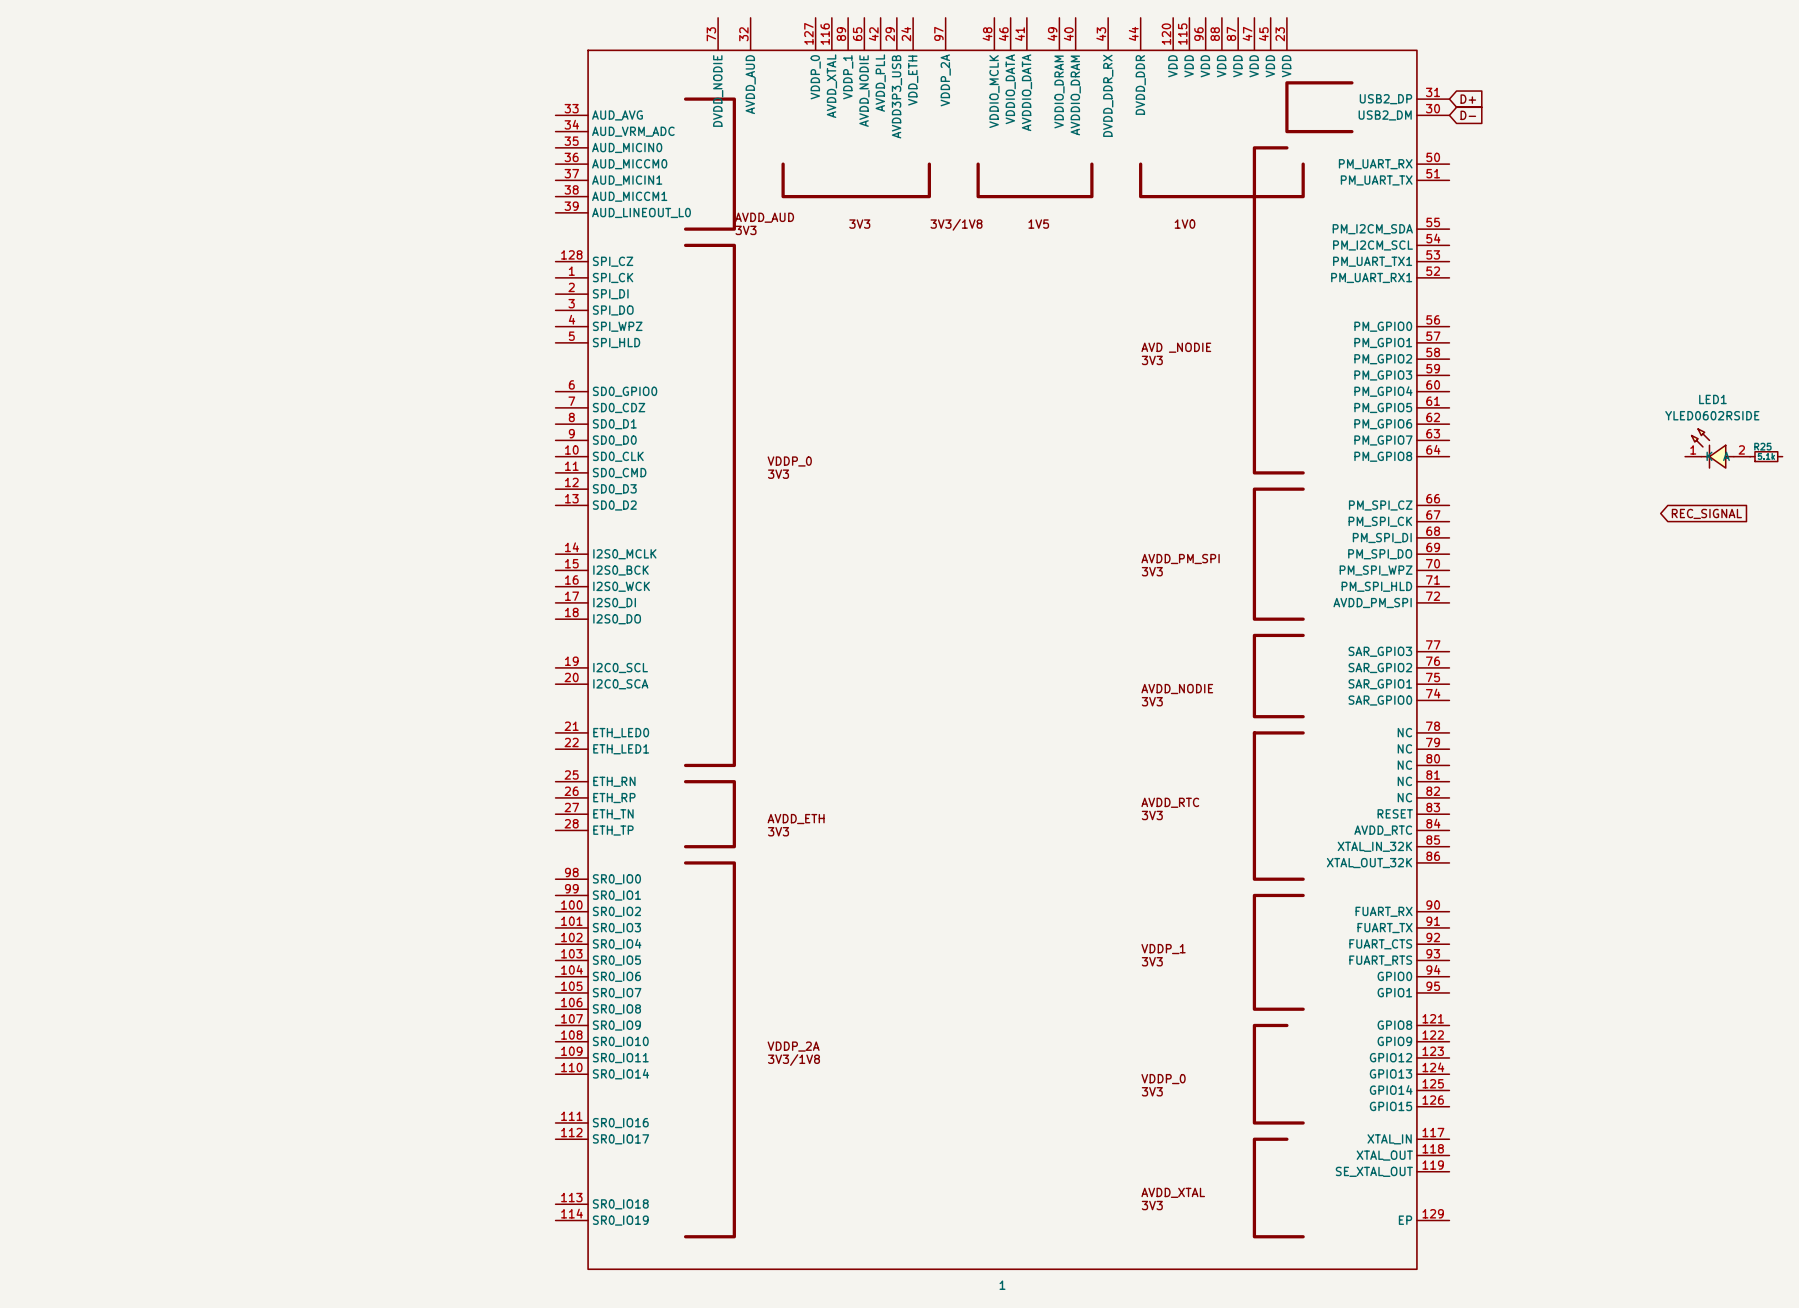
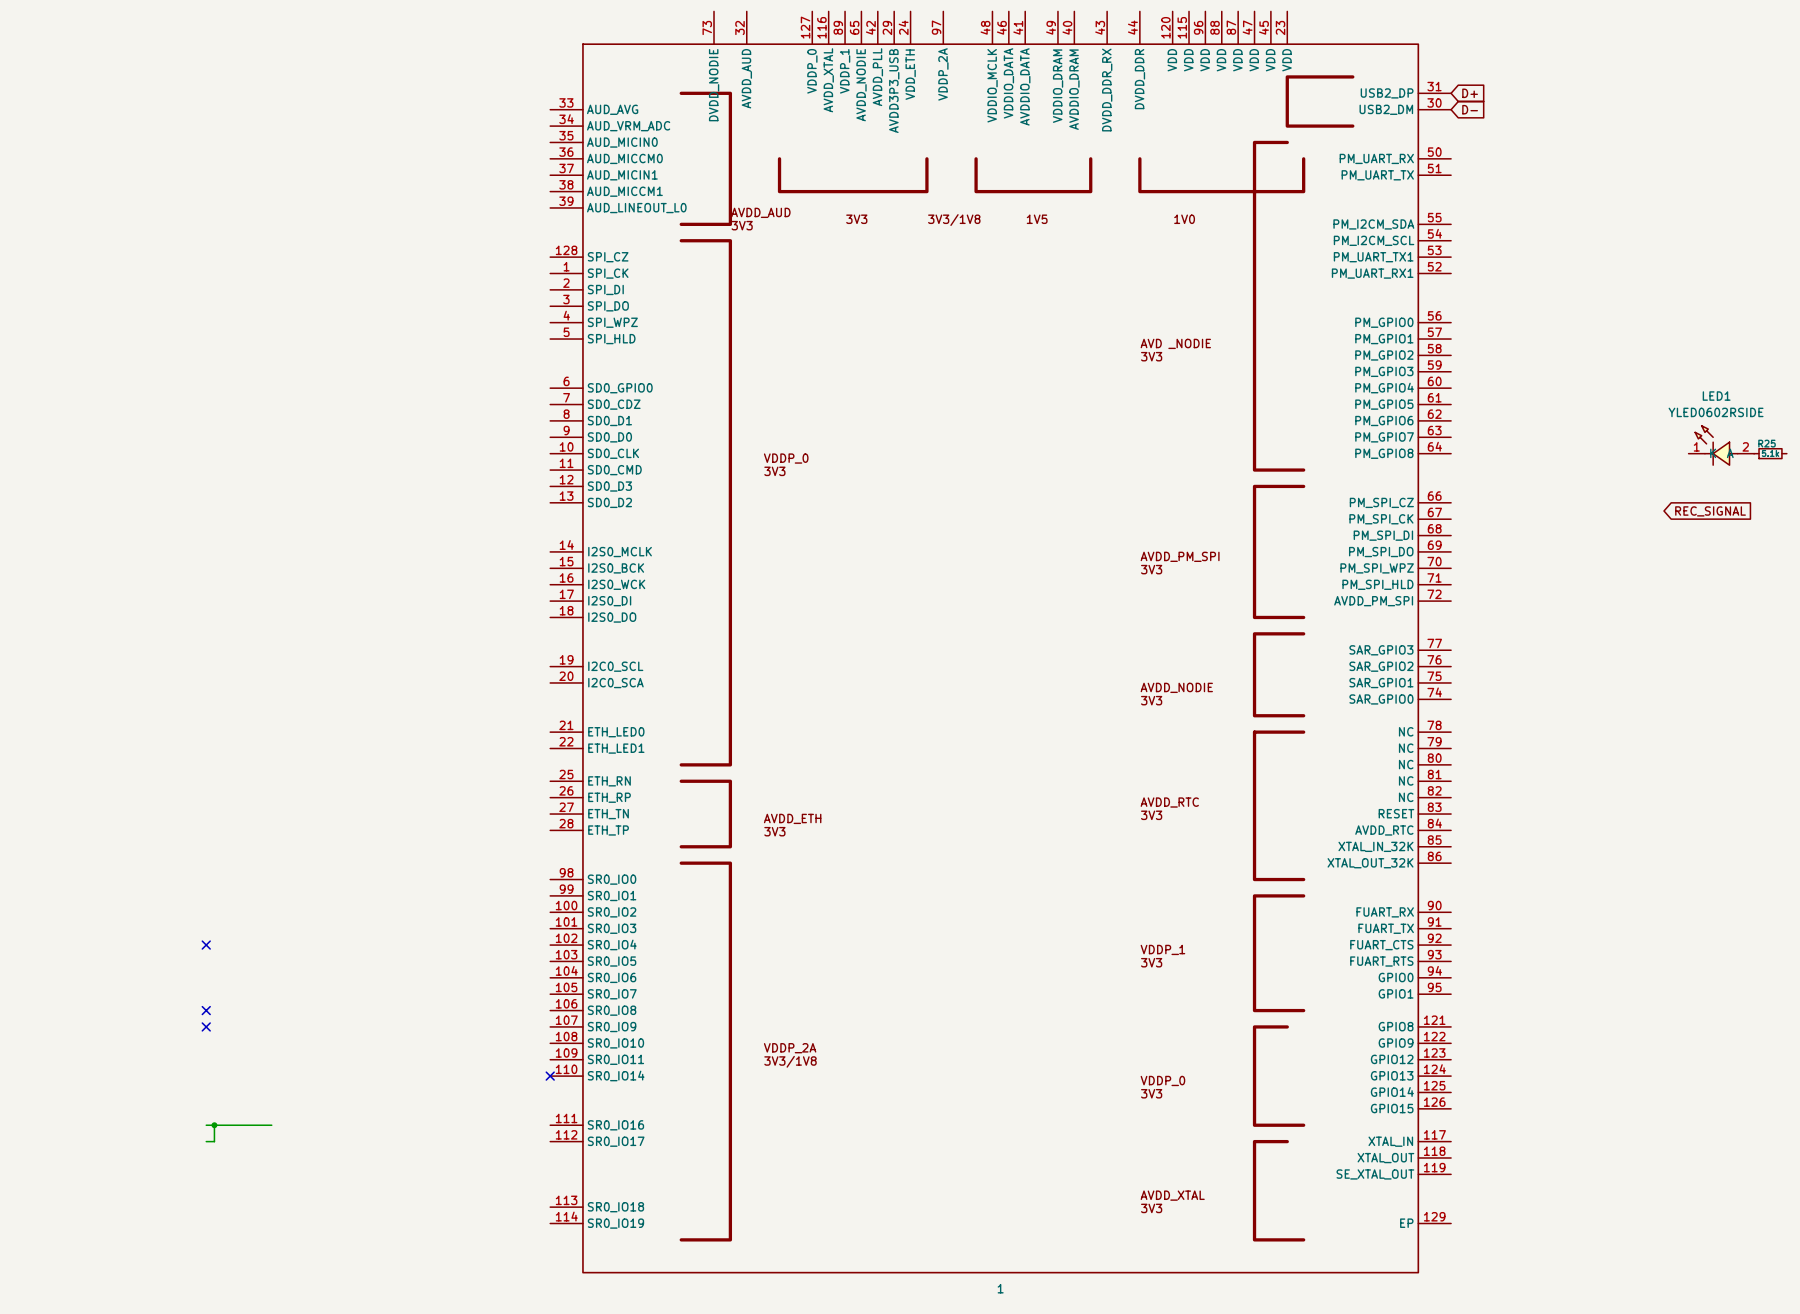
no-connect mark: none -> (206, 945)
no-connect mark: none -> (206, 1010)
no-connect mark: none -> (206, 1026)
no-connect mark: none -> (550, 1076)
wire: none -> (206, 1125) (271, 1125)
wire: none -> (214, 1125) (214, 1141) (206, 1141)
junction: none -> (214, 1125)

